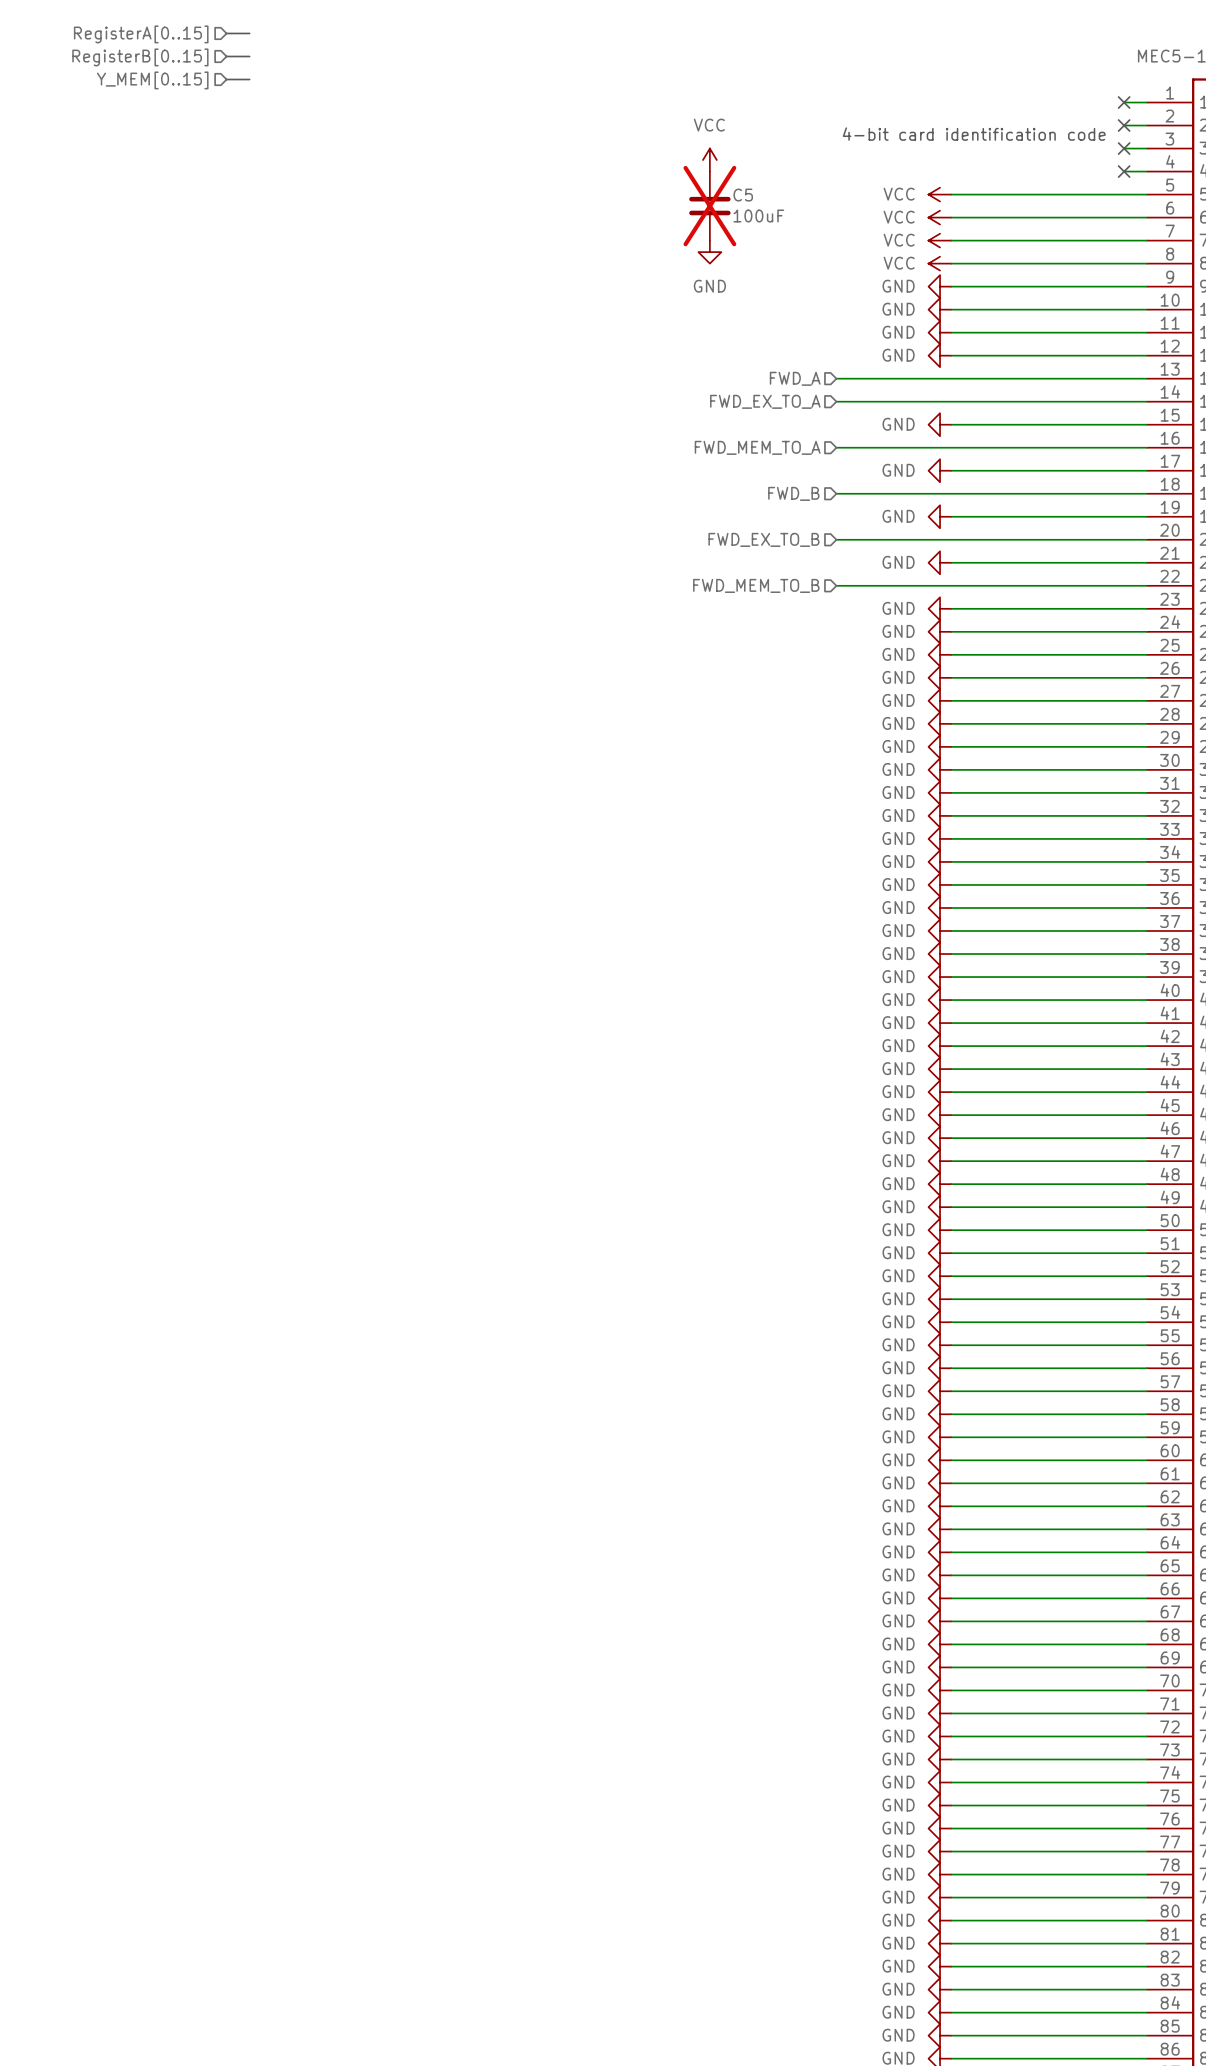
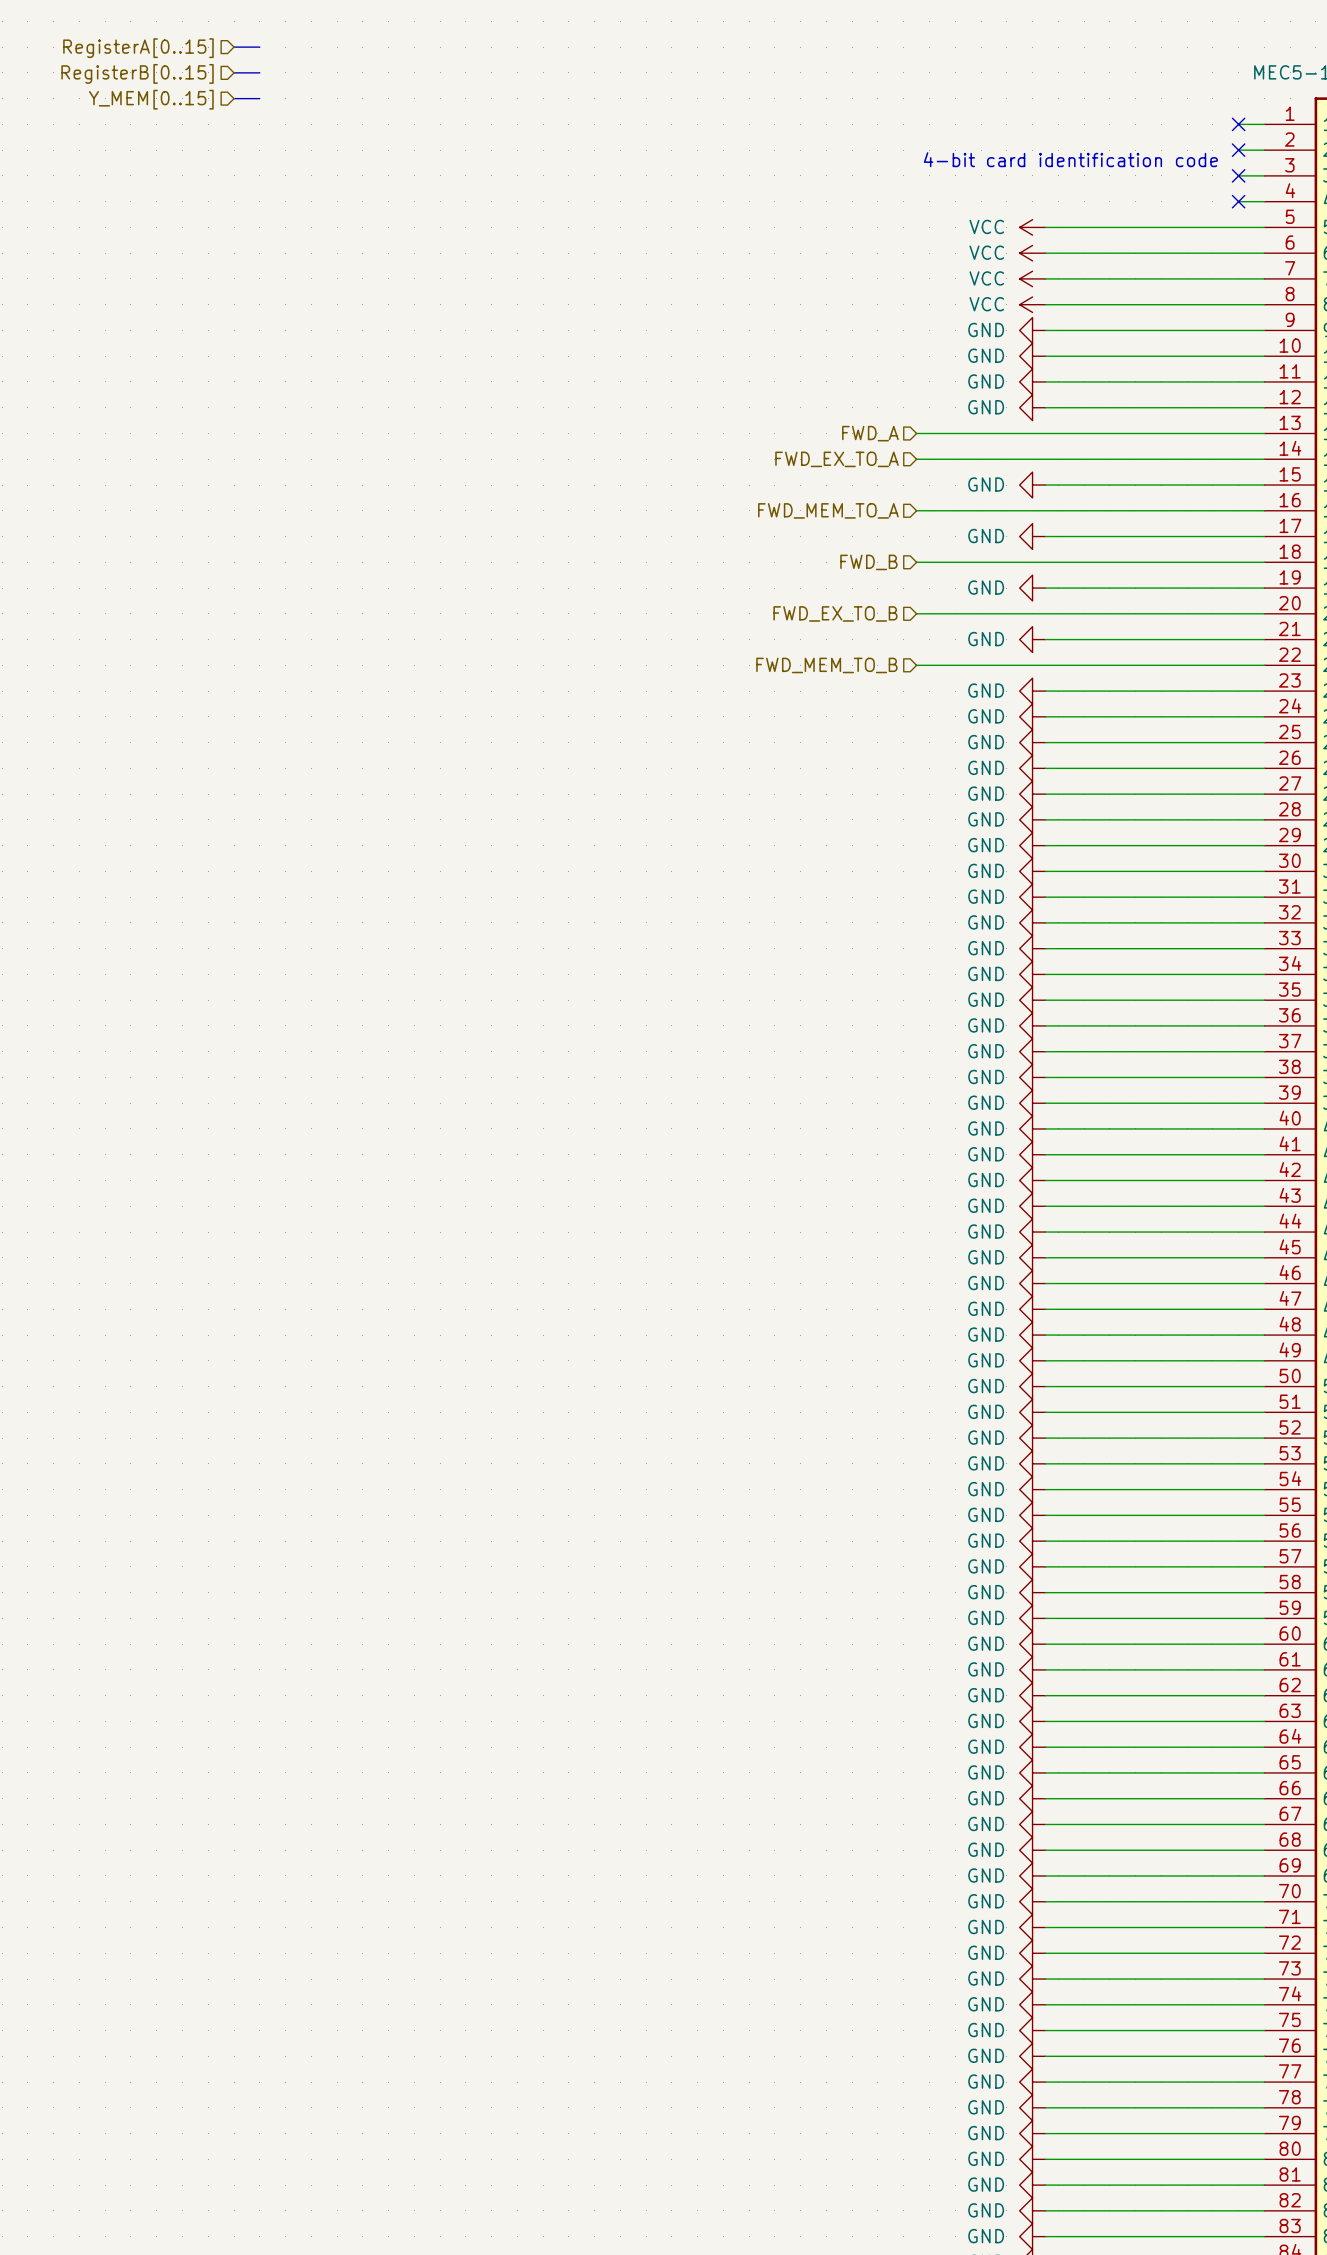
power symbol: VCC (709, 160) -> none
C5: 100uF (709, 206) -> none
power symbol: GND (709, 252) -> none

